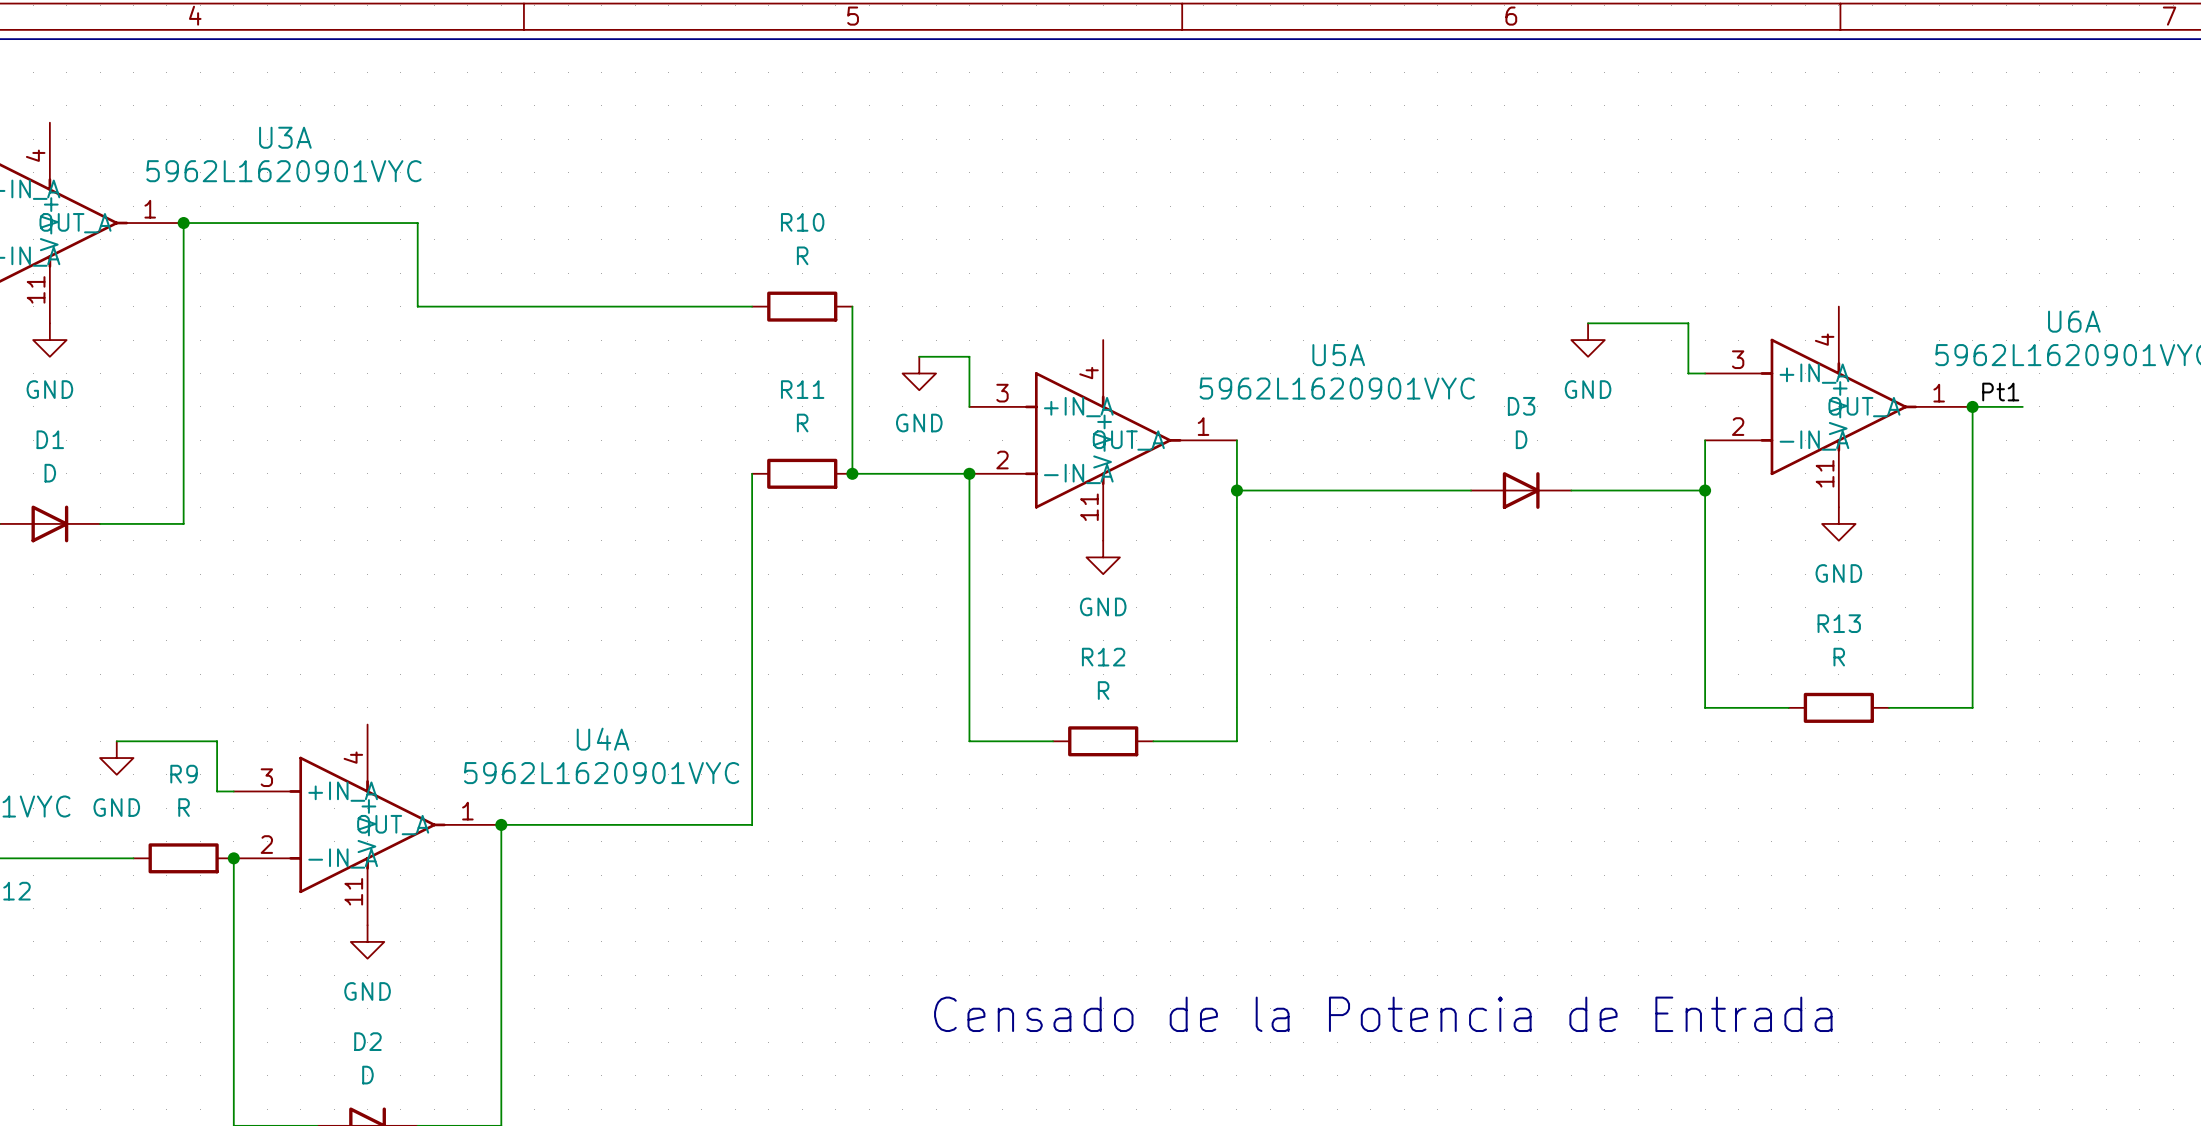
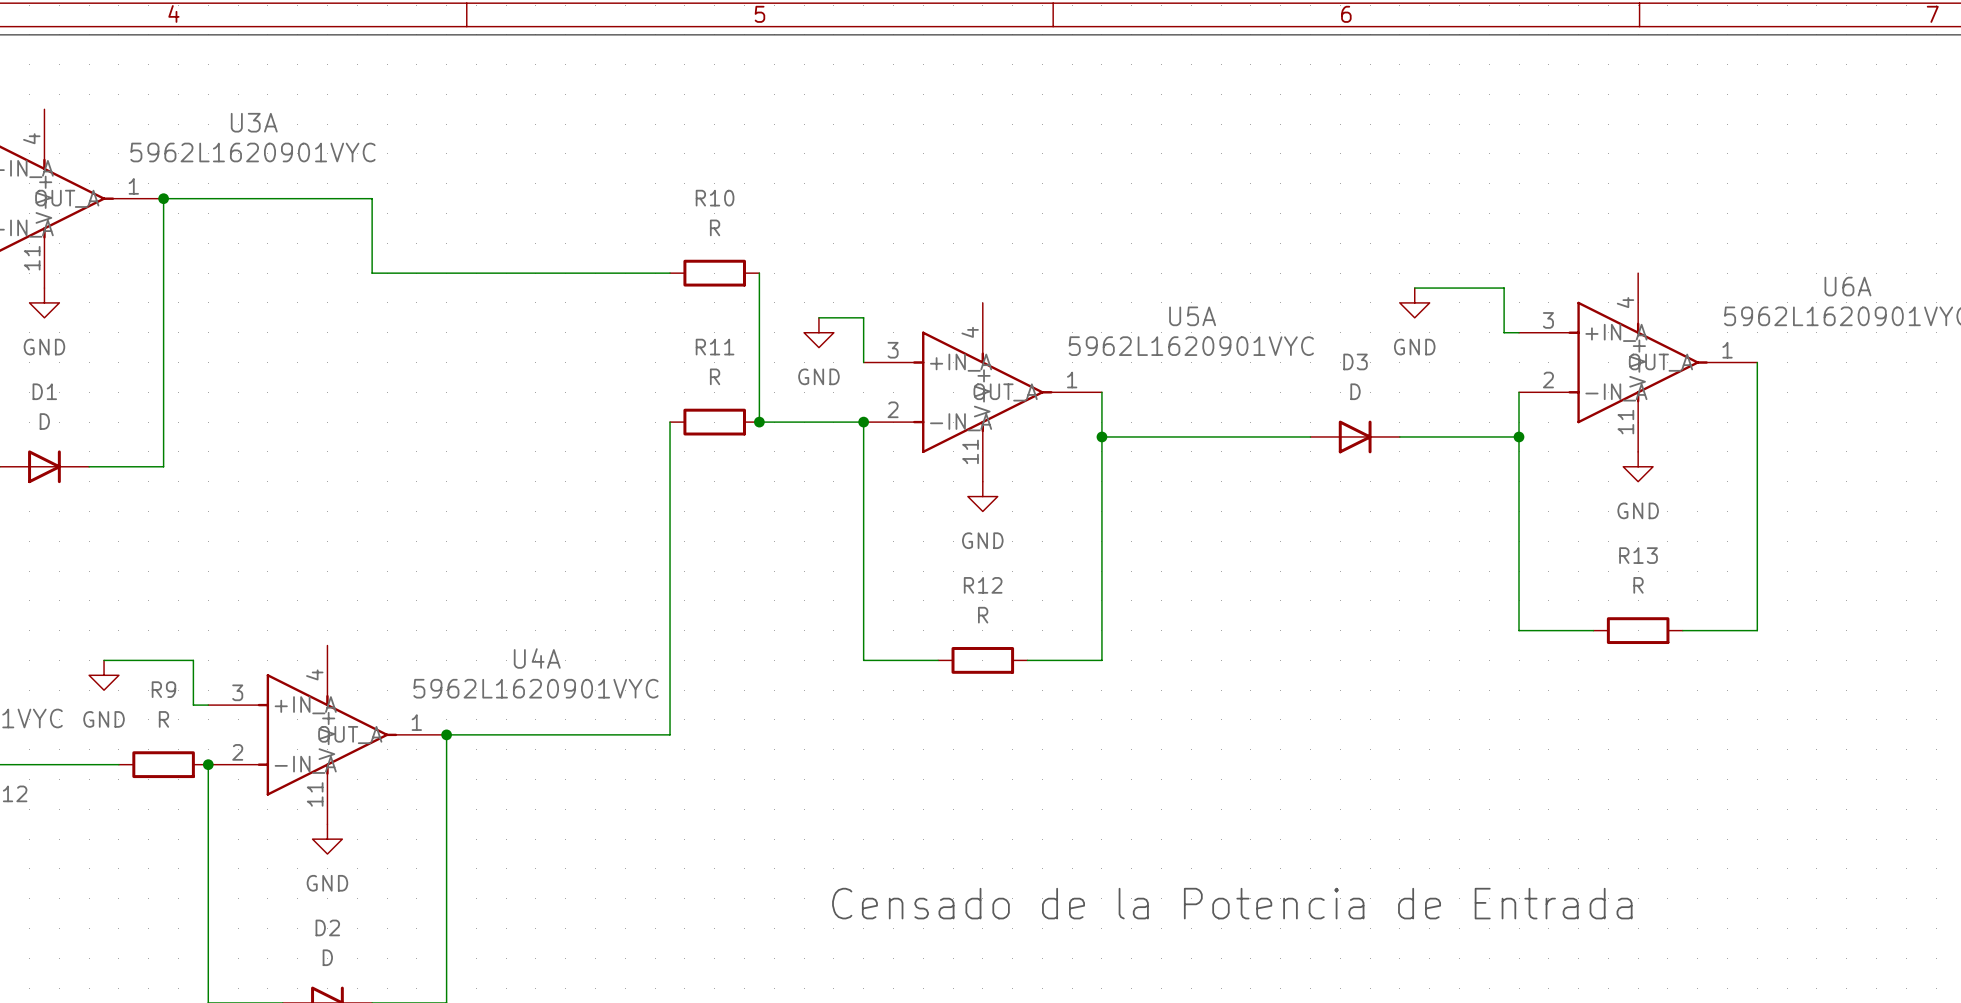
label: Pt1 (2000, 392) -> none
wire: (1972, 406) (2022, 406) -> none
junction: (1972, 406) -> none

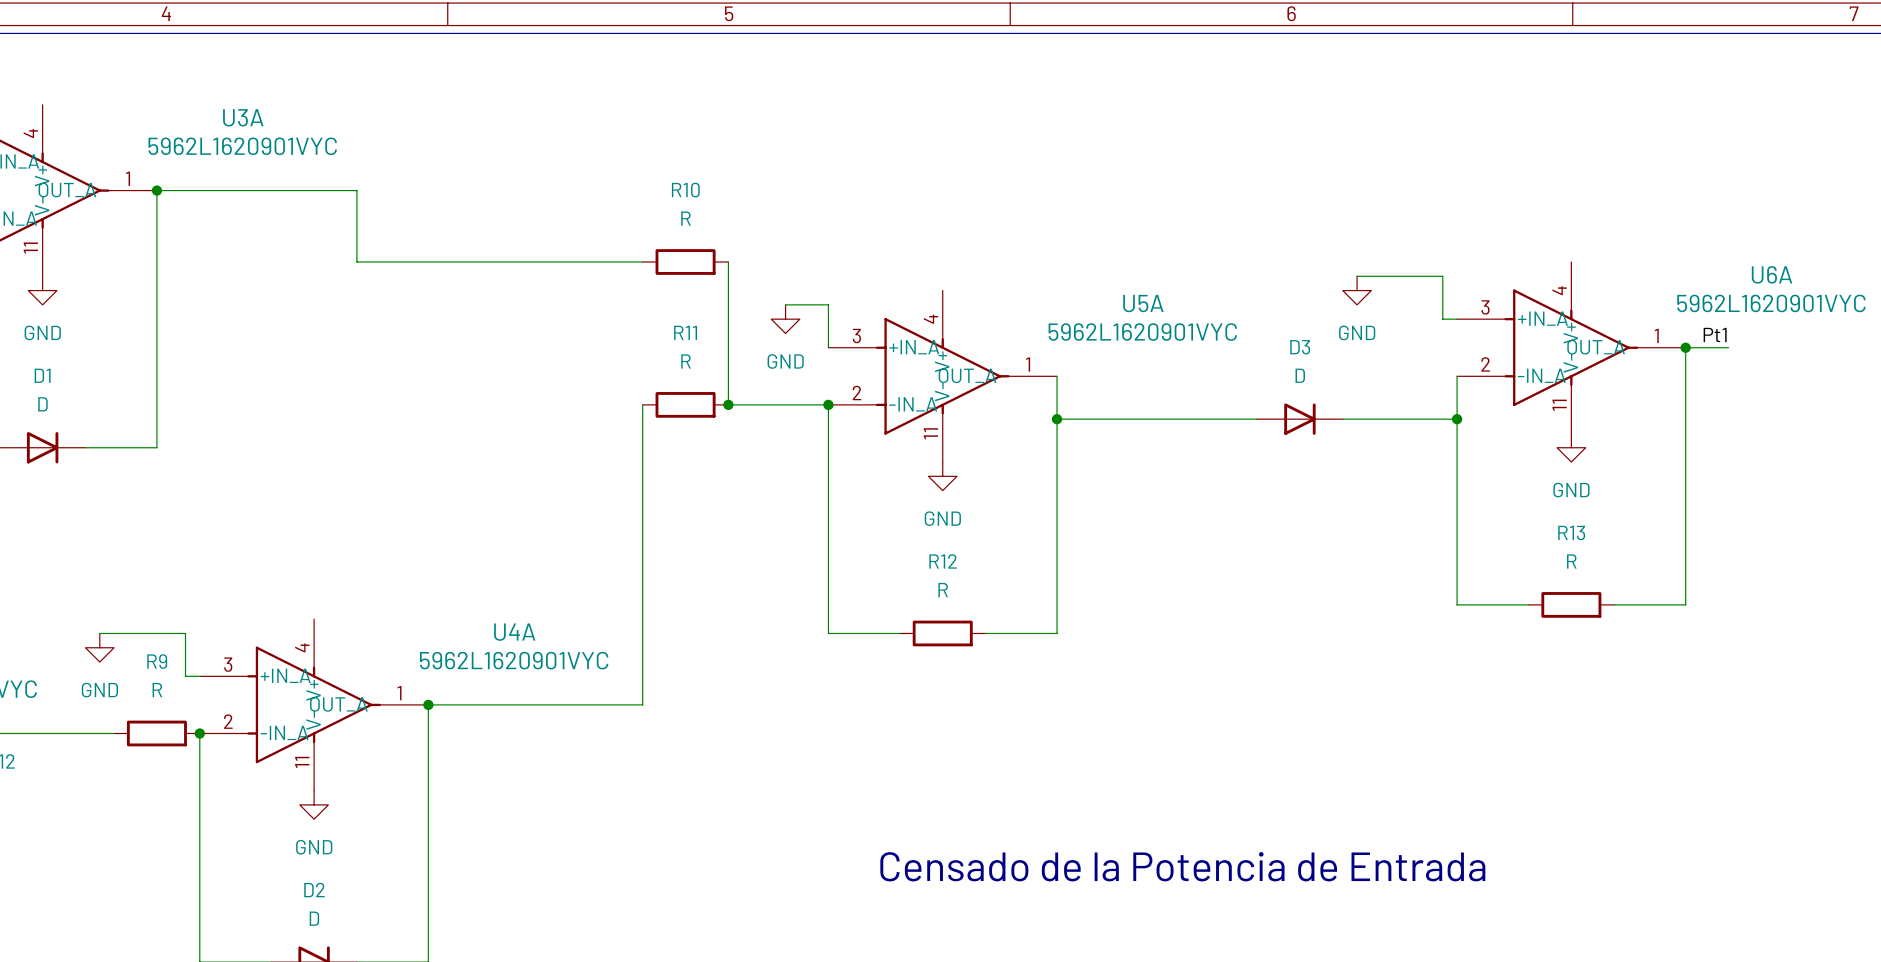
label: none -> Pt1 (1715, 334)
wire: none -> (1685, 347) (1728, 347)
junction: none -> (1685, 347)

